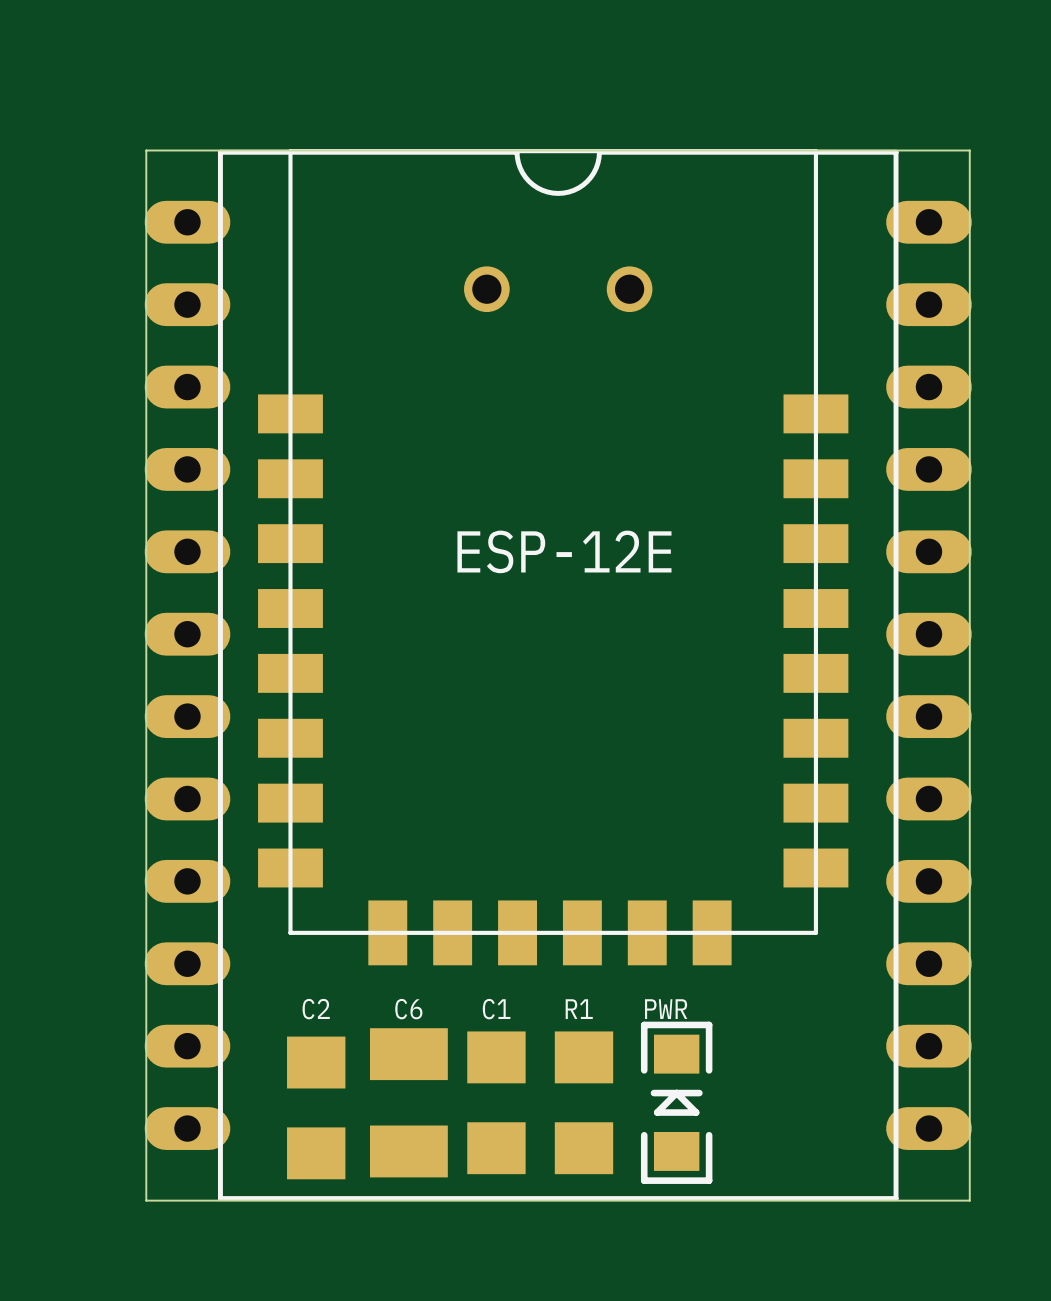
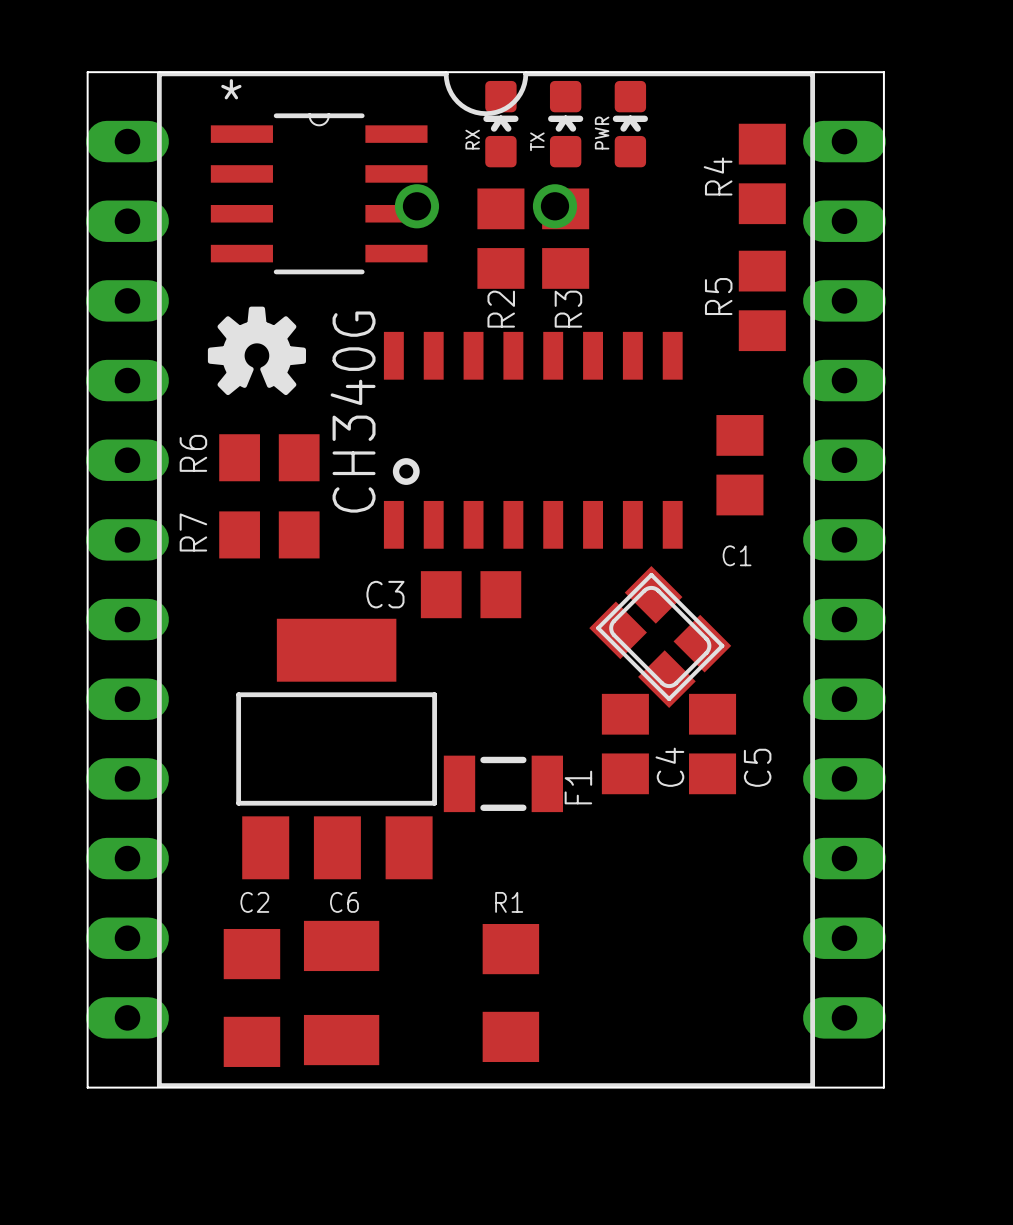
RX: none -> (500, 124)
TX: none -> (565, 124)
PWR: none -> (630, 124)
R4: none -> (762, 173)
part: none -> (319, 193)
R2: none -> (500, 238)
R3: none -> (565, 238)
R5: none -> (762, 300)
drawing: none -> [207, 306, 306, 396]
part: none -> (533, 440)
R6: none -> (269, 457)
part: (553, 557) -> none
R7: none -> (269, 534)
C3: none -> (471, 594)
part: none -> (660, 636)
C4: none -> (625, 744)
C5: none -> (712, 744)
part: none -> (336, 749)
F1: none -> (503, 783)
C1 name position: C1 (496, 1009) -> C1 (737, 555)
C1 footprint: [467, 1031, 526, 1175] -> [716, 415, 764, 516]
PWR: (676, 1102) -> none

